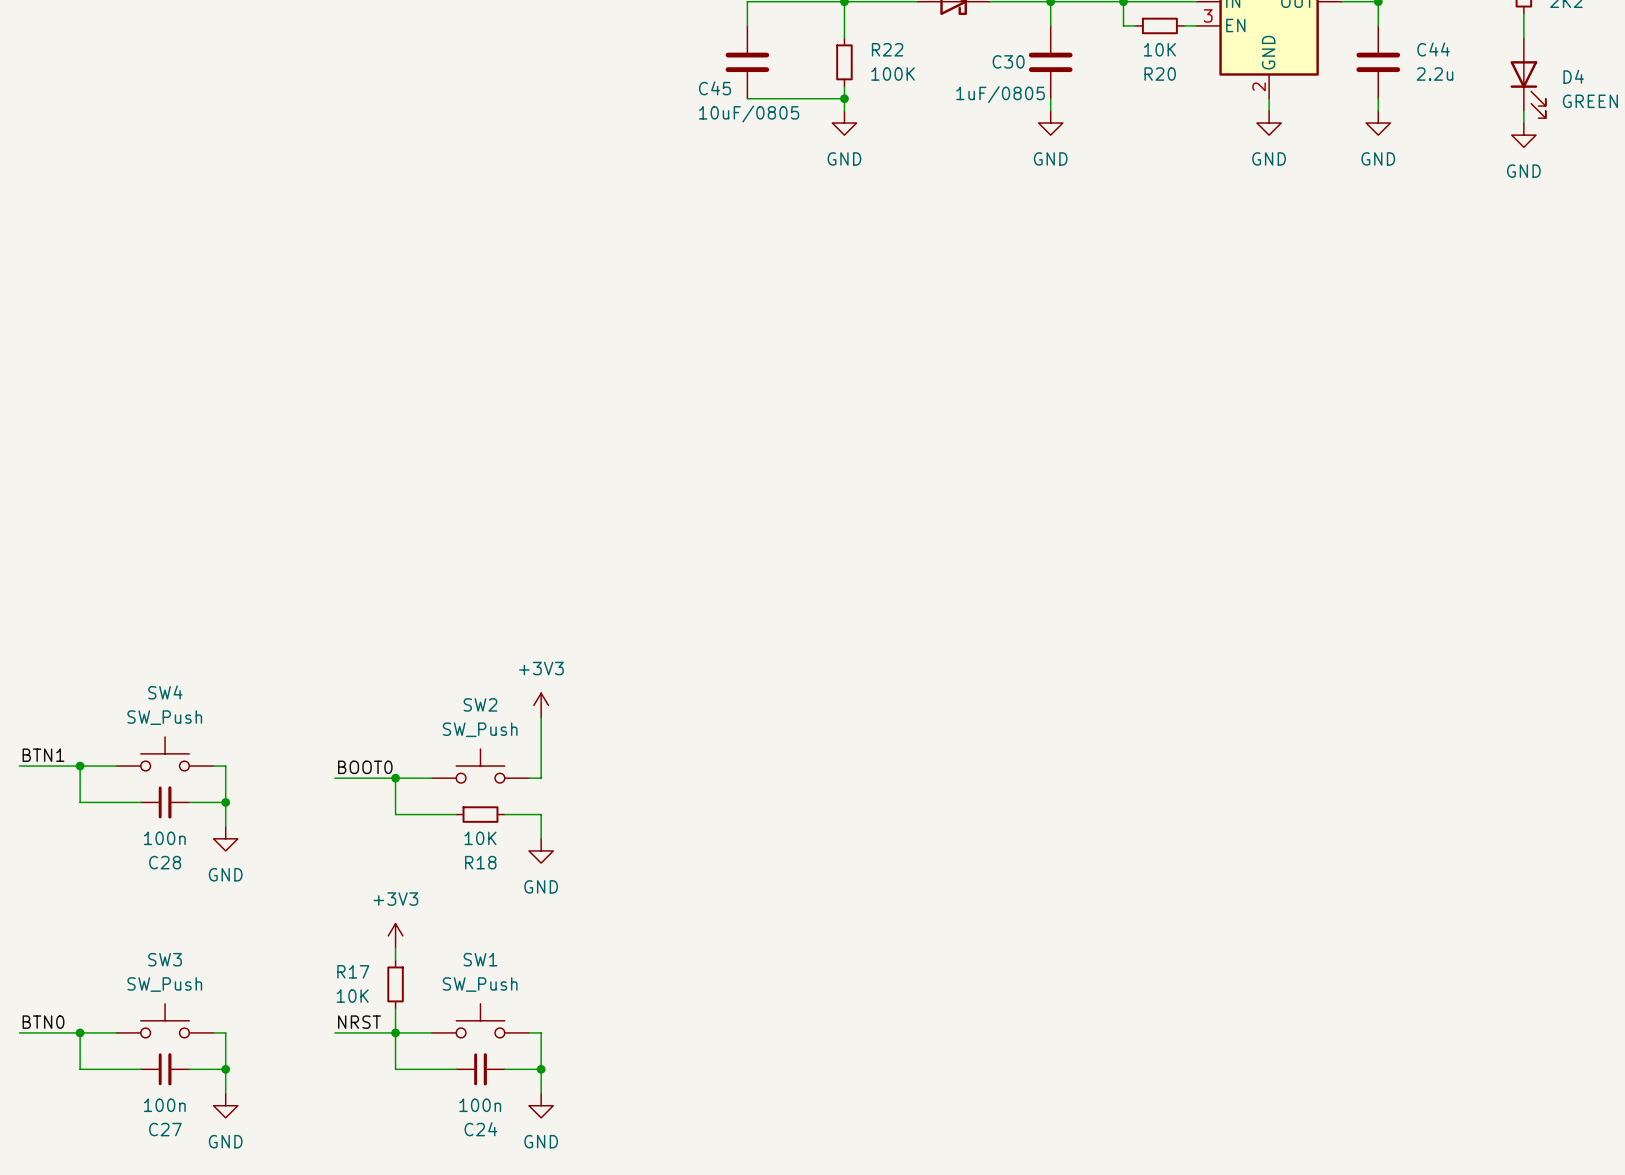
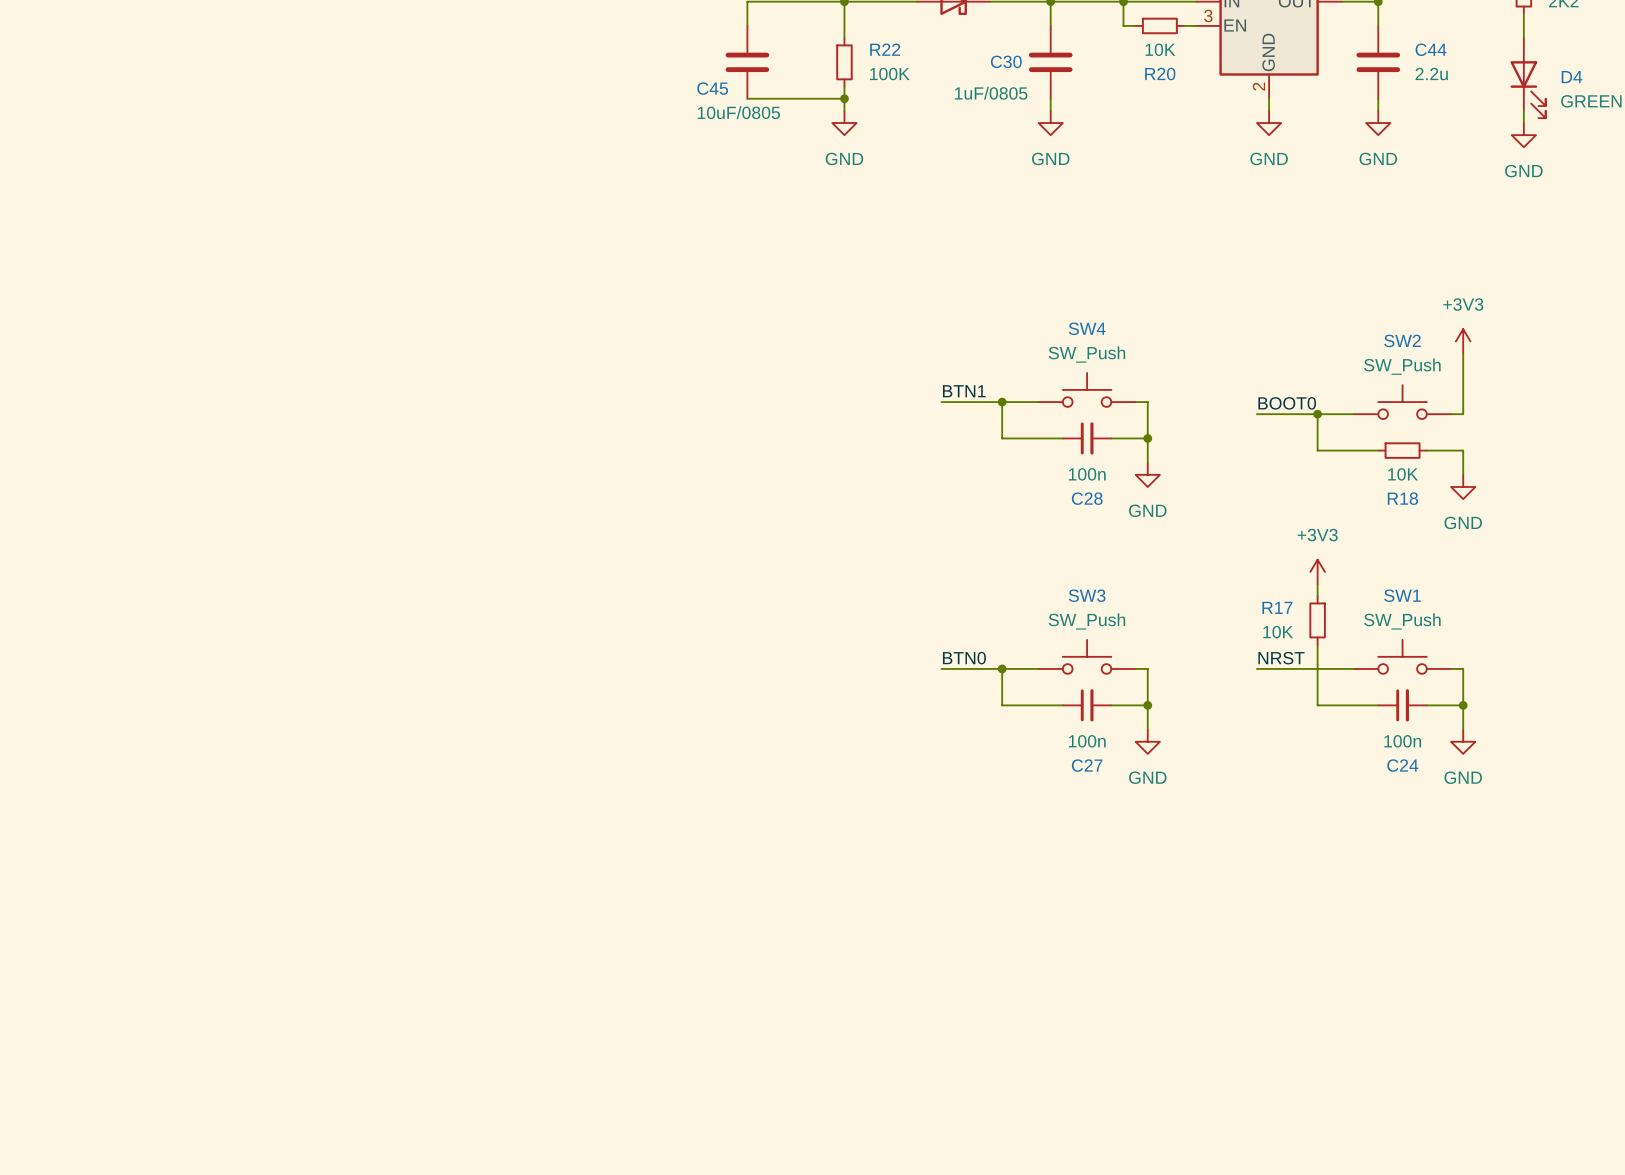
power symbol: none -> +3V3 (1463, 341)
wire: none -> (1463, 353) (1463, 414) (1451, 414)
label: none -> BTN1 (964, 391)
wire: none -> (941, 402) (1038, 402)
wire: none -> (1002, 402) (1002, 438) (1062, 438)
junction: none -> (1002, 402)
wire: none -> (1135, 402) (1147, 402) (1147, 462)
label: none -> BOOT0 (1287, 403)
wire: none -> (1256, 414) (1354, 414)
wire: none -> (1317, 414) (1317, 450) (1378, 450)
junction: none -> (1317, 414)
wire: none -> (1111, 438) (1147, 438)
junction: none -> (1147, 438)
wire: none -> (1426, 450) (1463, 450) (1463, 474)
power symbol: none -> GND (1147, 474)
power symbol: none -> GND (1463, 486)
power symbol: none -> +3V3 (1317, 571)
wire: none -> (1317, 584) (1317, 596)
wire: none -> (1317, 644) (1317, 705) (1378, 705)
label: none -> BTN0 (964, 658)
label: none -> NRST (1281, 658)
wire: none -> (941, 668) (1038, 668)
wire: none -> (1002, 668) (1002, 705) (1062, 705)
junction: none -> (1002, 668)
wire: none -> (1135, 668) (1147, 668) (1147, 729)
wire: none -> (1256, 668) (1354, 668)
wire: none -> (1451, 668) (1463, 668) (1463, 729)
power symbol: +3V3 (541, 705) -> none
wire: none -> (1111, 705) (1147, 705)
junction: none -> (1147, 705)
wire: none -> (1426, 705) (1463, 705)
junction: none -> (1463, 705)
wire: (541, 717) (541, 778) (529, 778) -> none
power symbol: none -> GND (1147, 741)
power symbol: none -> GND (1463, 741)
SW4 position: (165, 753) -> (1087, 389)
label: BTN1 (43, 755) -> none
wire: (19, 766) (116, 766) -> none
wire: (80, 766) (80, 802) (140, 802) -> none
junction: (80, 766) -> none
wire: (213, 766) (225, 766) (225, 826) -> none
SW2 position: (480, 766) -> (1402, 402)
label: BOOT0 (365, 767) -> none
wire: (334, 778) (431, 778) -> none
wire: (395, 778) (395, 814) (456, 814) -> none
junction: (395, 778) -> none
C28 position: (165, 802) -> (1087, 438)
wire: (189, 802) (225, 802) -> none
junction: (225, 802) -> none
R18 position: (480, 814) -> (1402, 450)
wire: (504, 814) (541, 814) (541, 838) -> none
power symbol: GND (225, 838) -> none
power symbol: GND (541, 850) -> none
power symbol: +3V3 (395, 935) -> none
wire: (395, 948) (395, 960) -> none
R17 position: (395, 984) -> (1317, 620)
wire: (395, 1008) (395, 1069) (456, 1069) -> none
SW3 position: (165, 1020) -> (1087, 656)
SW1 position: (480, 1020) -> (1402, 656)
label: BTN0 (43, 1022) -> none
label: NRST (359, 1022) -> none
wire: (19, 1032) (116, 1032) -> none
wire: (80, 1032) (80, 1069) (140, 1069) -> none
junction: (80, 1032) -> none
wire: (213, 1032) (225, 1032) (225, 1093) -> none
wire: (334, 1032) (431, 1032) -> none
junction: (395, 1032) -> none
wire: (529, 1032) (541, 1032) (541, 1093) -> none
C27 position: (165, 1069) -> (1087, 705)
wire: (189, 1069) (225, 1069) -> none
junction: (225, 1069) -> none
C24 position: (480, 1069) -> (1402, 705)
wire: (504, 1069) (541, 1069) -> none
junction: (541, 1069) -> none
power symbol: GND (225, 1105) -> none
power symbol: GND (541, 1105) -> none

